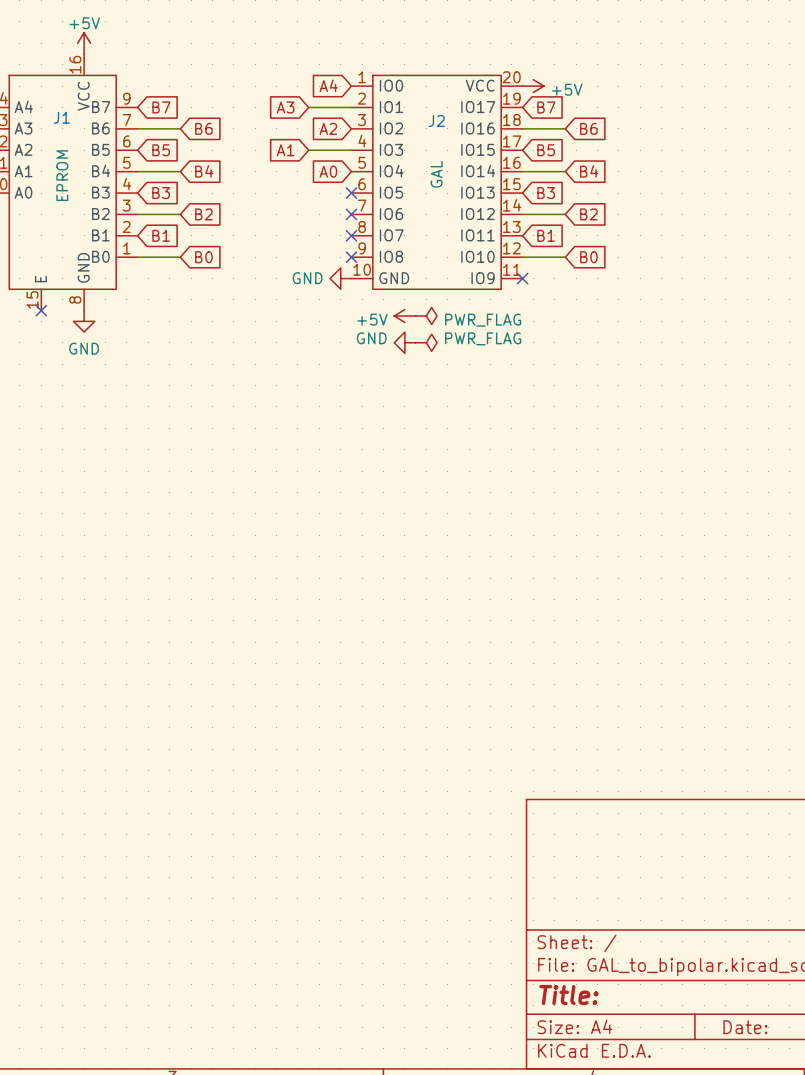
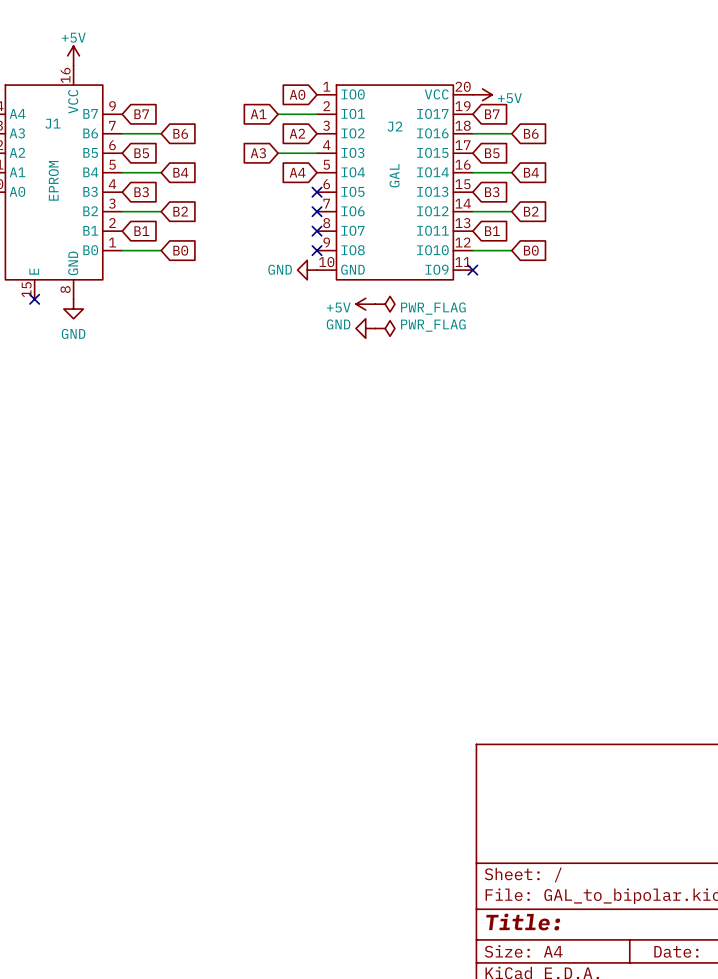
global label: A4 (328, 85) -> A0 (297, 94)
global label: A3 (285, 107) -> A1 (258, 114)
global label: A1 (285, 150) -> A3 (258, 153)
global label: A0 (328, 171) -> A4 (297, 172)

